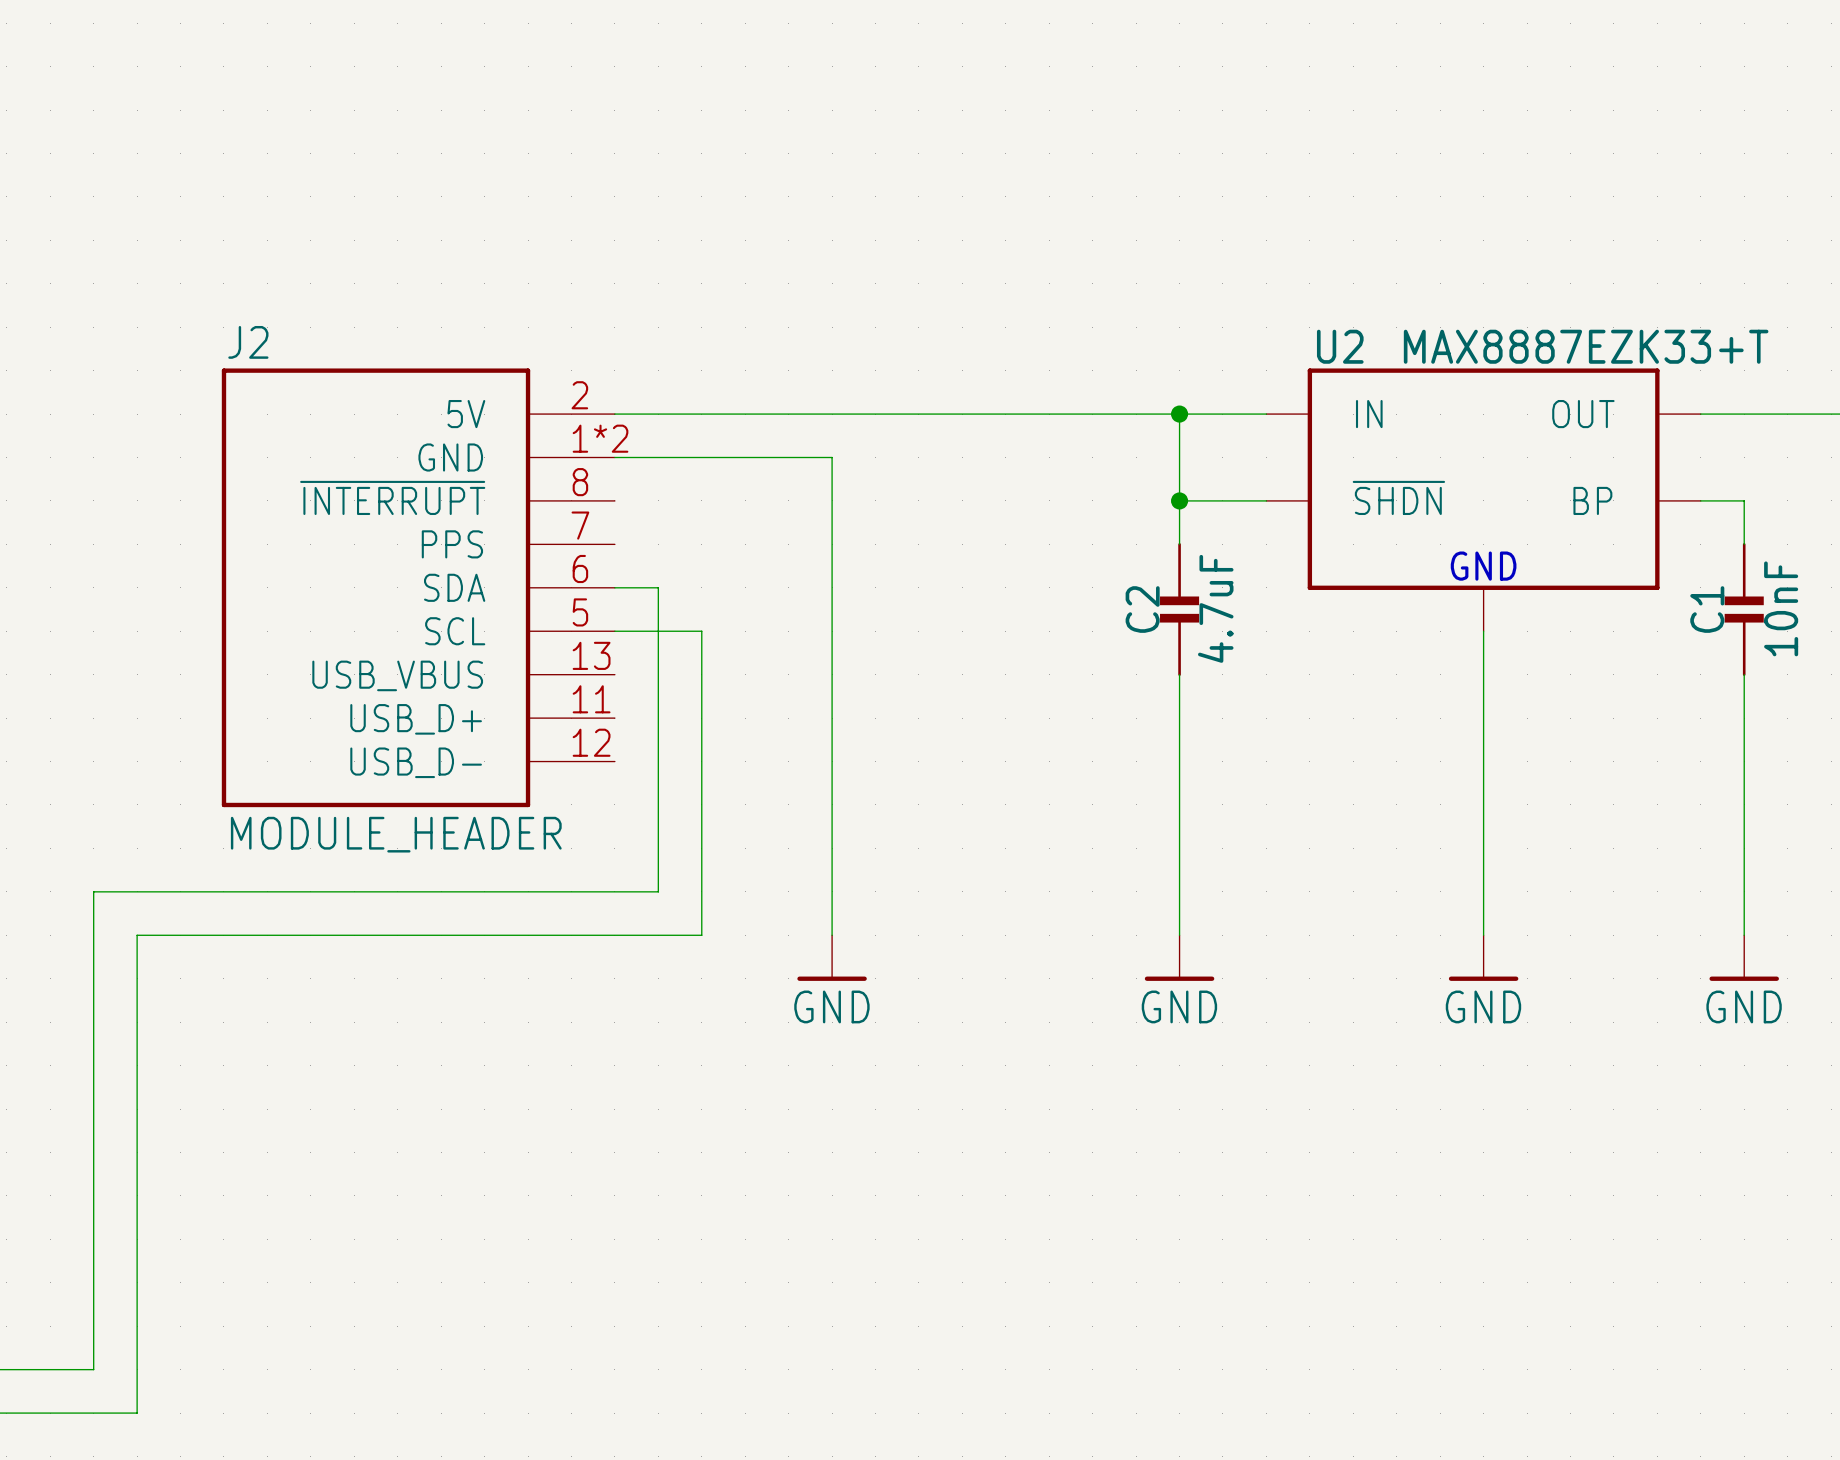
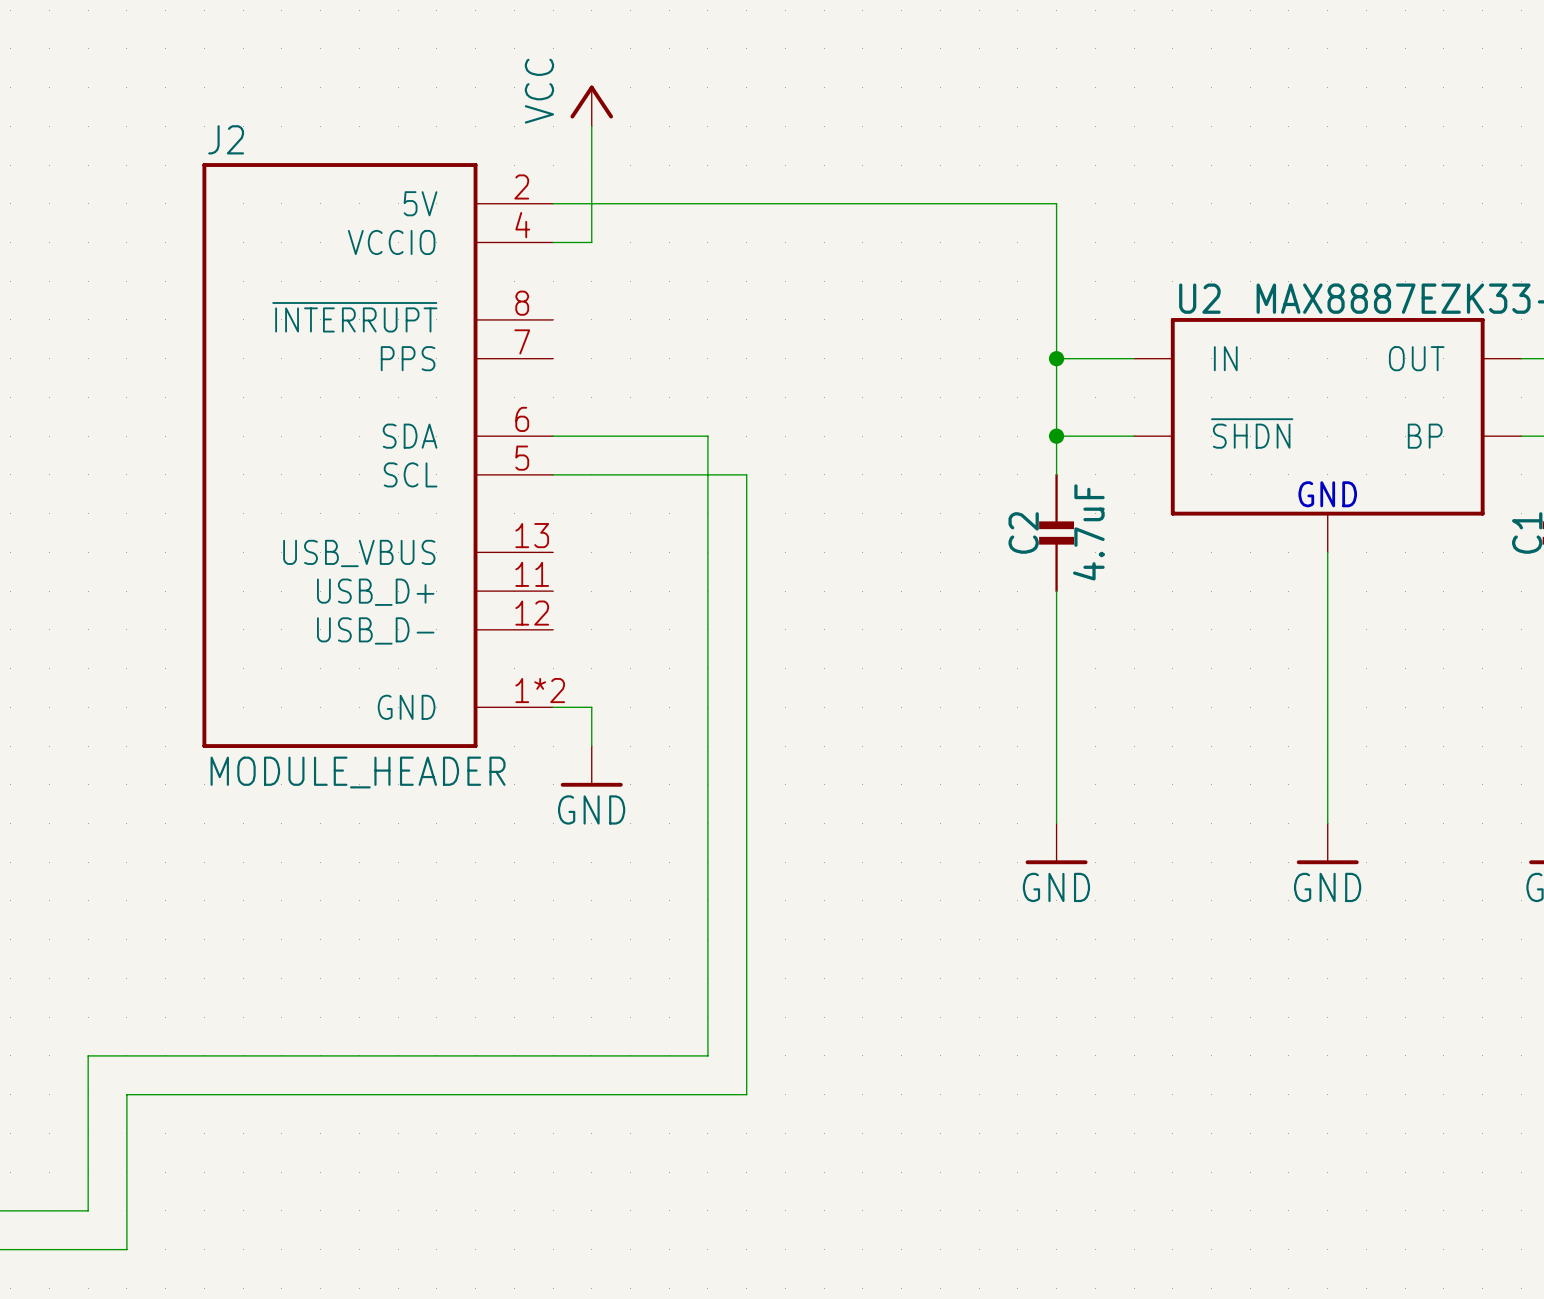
power symbol: none -> VCC (591, 105)
wire: none -> (591, 126) (591, 242) (553, 242)
J2 name position: J2 (248, 342) -> J2 (226, 139)
J2 symbol: [221, 368, 615, 808] -> [202, 163, 554, 748]
wire: (614, 414) (1179, 414) -> (553, 203) (1056, 203) (1056, 358)
wire: (614, 457) (832, 457) (832, 544) -> (553, 474) (746, 474)
wire: (614, 587) (658, 587) (658, 804) -> (553, 707) (591, 707)
wire: (614, 631) (701, 631) (701, 935) (137, 935) (137, 1239) -> (746, 823) (746, 1094) (126, 1094)
J2 value position: MODULE_HEADER (396, 834) -> MODULE_HEADER (358, 772)
wire: (658, 848) (658, 891) (93, 891) (93, 1195) -> (553, 436) (707, 436) (707, 1055) (88, 1055)
power symbol position: GND (832, 958) -> GND (591, 766)

